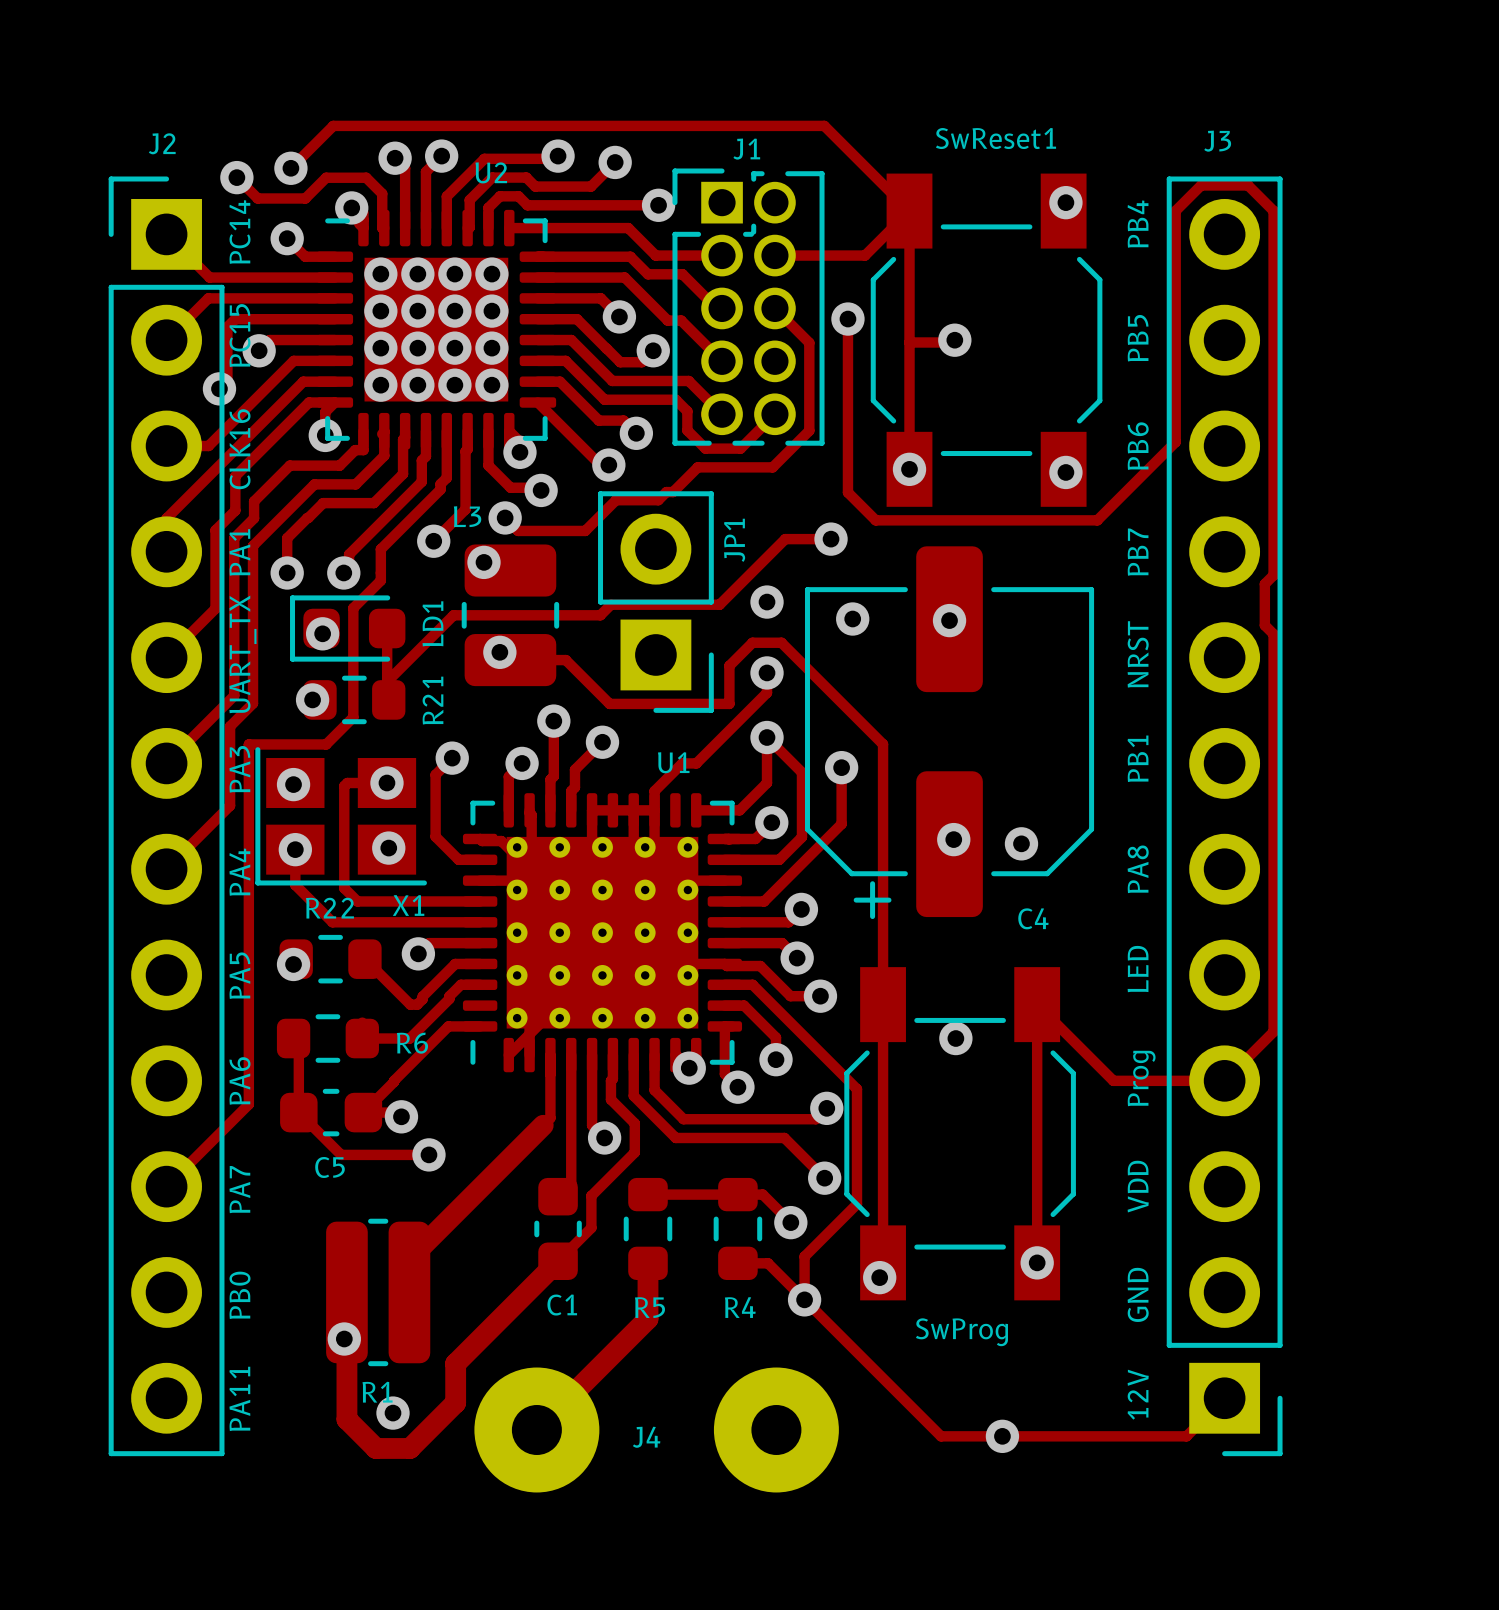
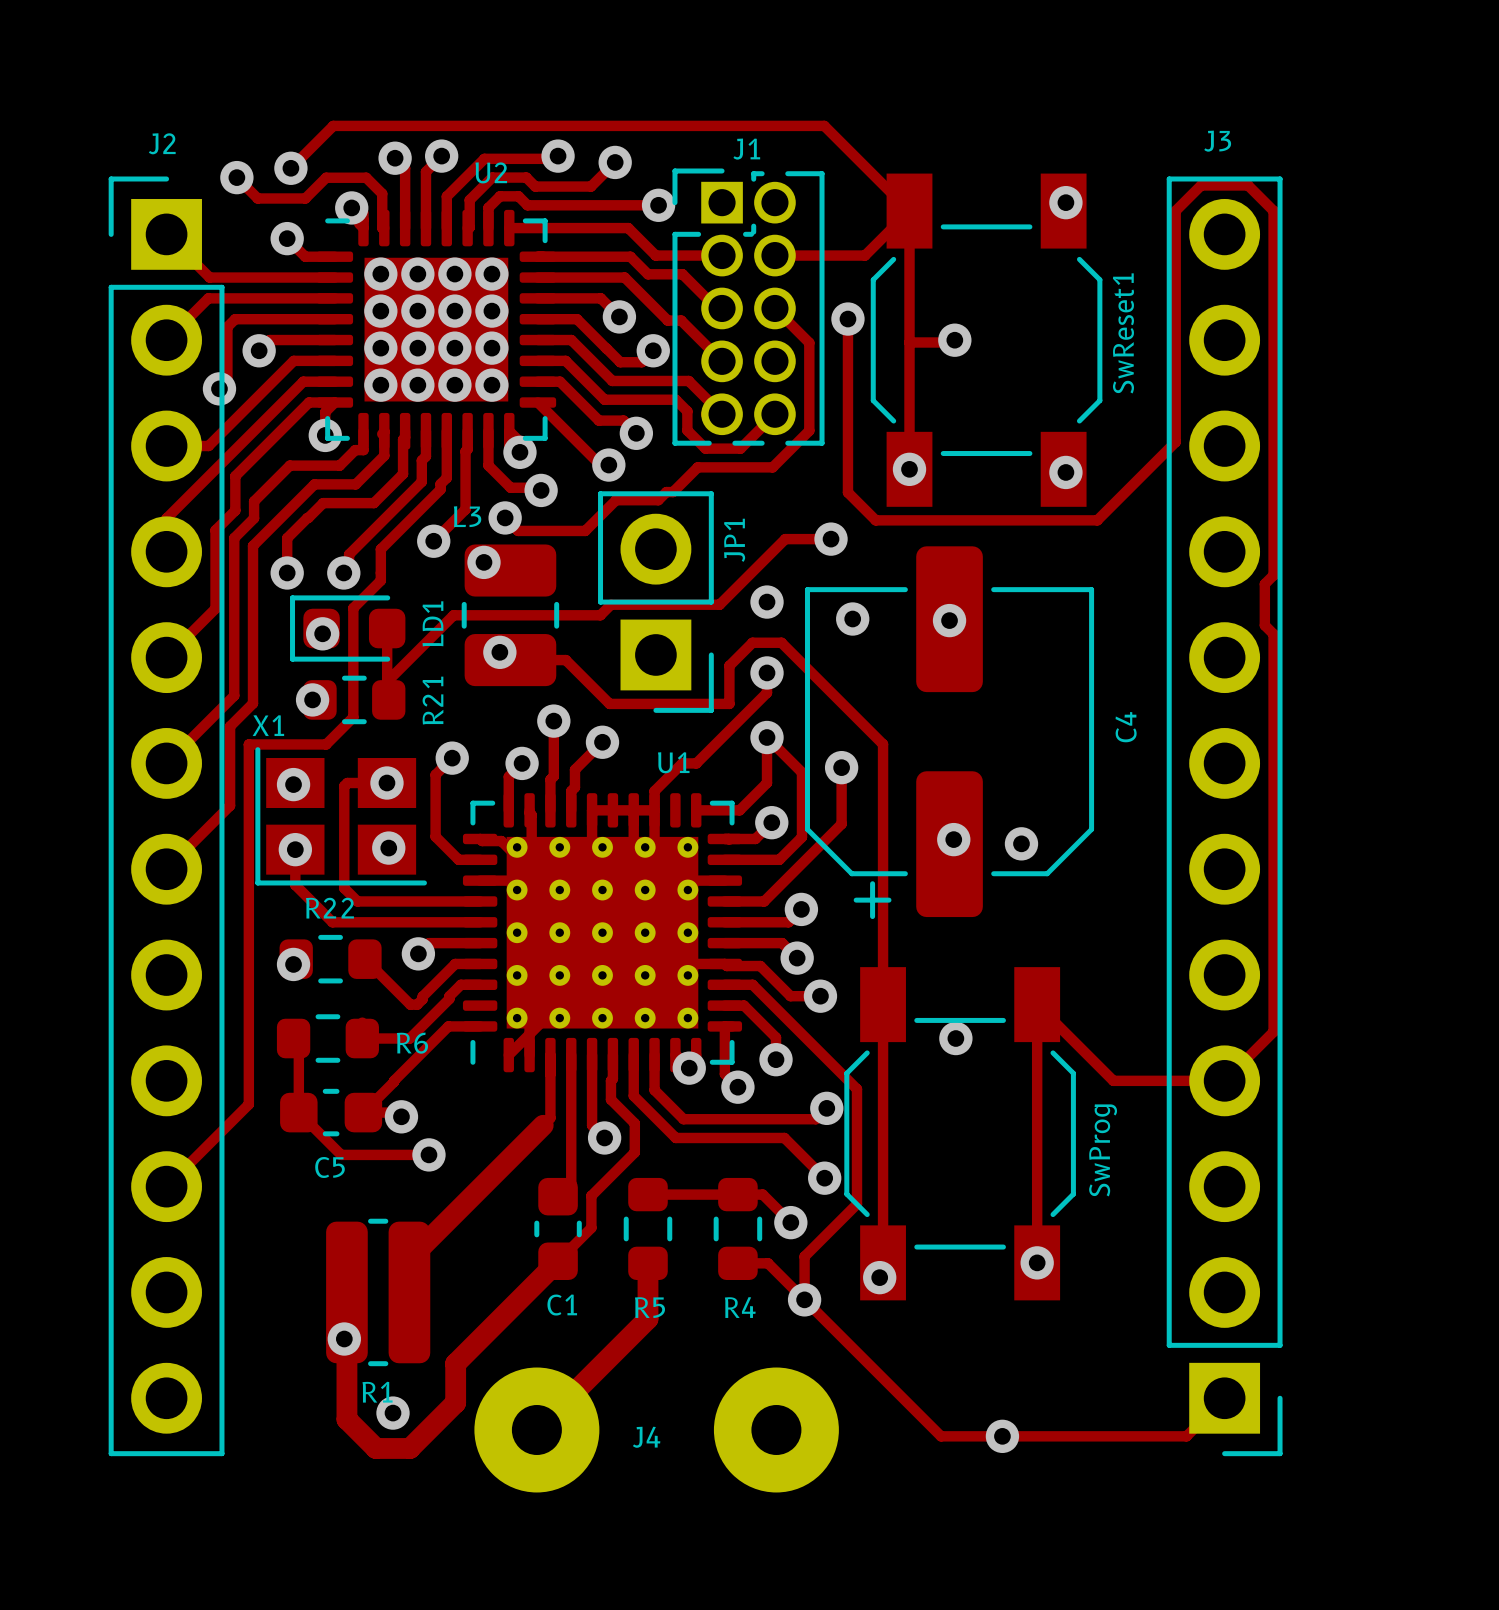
SwReset1 name rotation: 0° (995, 138) -> 90° counterclockwise (1123, 333)
SwReset1 name position: SwReset1 (995, 138) -> SwReset1 (1123, 333)
text: PB4 (1138, 224) -> none
text: PC14 (239, 232) -> none
text: PC15 (239, 335) -> none
text: PB5 (1138, 338) -> none
text: PB6 (1138, 446) -> none
text: CLK16 (239, 449) -> none
text: PA1 (239, 552) -> none
text: PB7 (1138, 552) -> none
text: UART_TX (242, 654) -> none
text: NRST (1138, 654) -> none
text: PB1 (1138, 758) -> none
text: PA3 (239, 769) -> none
text: PA8 (1138, 869) -> none
text: PA4 (239, 872) -> none
X1 name position: X1 (408, 905) -> X1 (268, 725)
C4 name rotation: 0° (1033, 918) -> 90° counterclockwise (1126, 727)
C4 name position: C4 (1033, 918) -> C4 (1126, 727)
text: LED (1138, 969) -> none
text: PA5 (239, 975) -> none
text: Prog (1141, 1078) -> none
text: PA6 (239, 1080) -> none
text: VDD (1138, 1186) -> none
text: PA7 (239, 1189) -> none
text: GND (1138, 1294) -> none
text: PB0 (239, 1295) -> none
SwProg name rotation: 0° (961, 1332) -> 90° counterclockwise (1103, 1150)
SwProg name position: SwProg (961, 1332) -> SwProg (1103, 1150)
text: 12V (1138, 1394) -> none
text: PA11 (239, 1398) -> none

